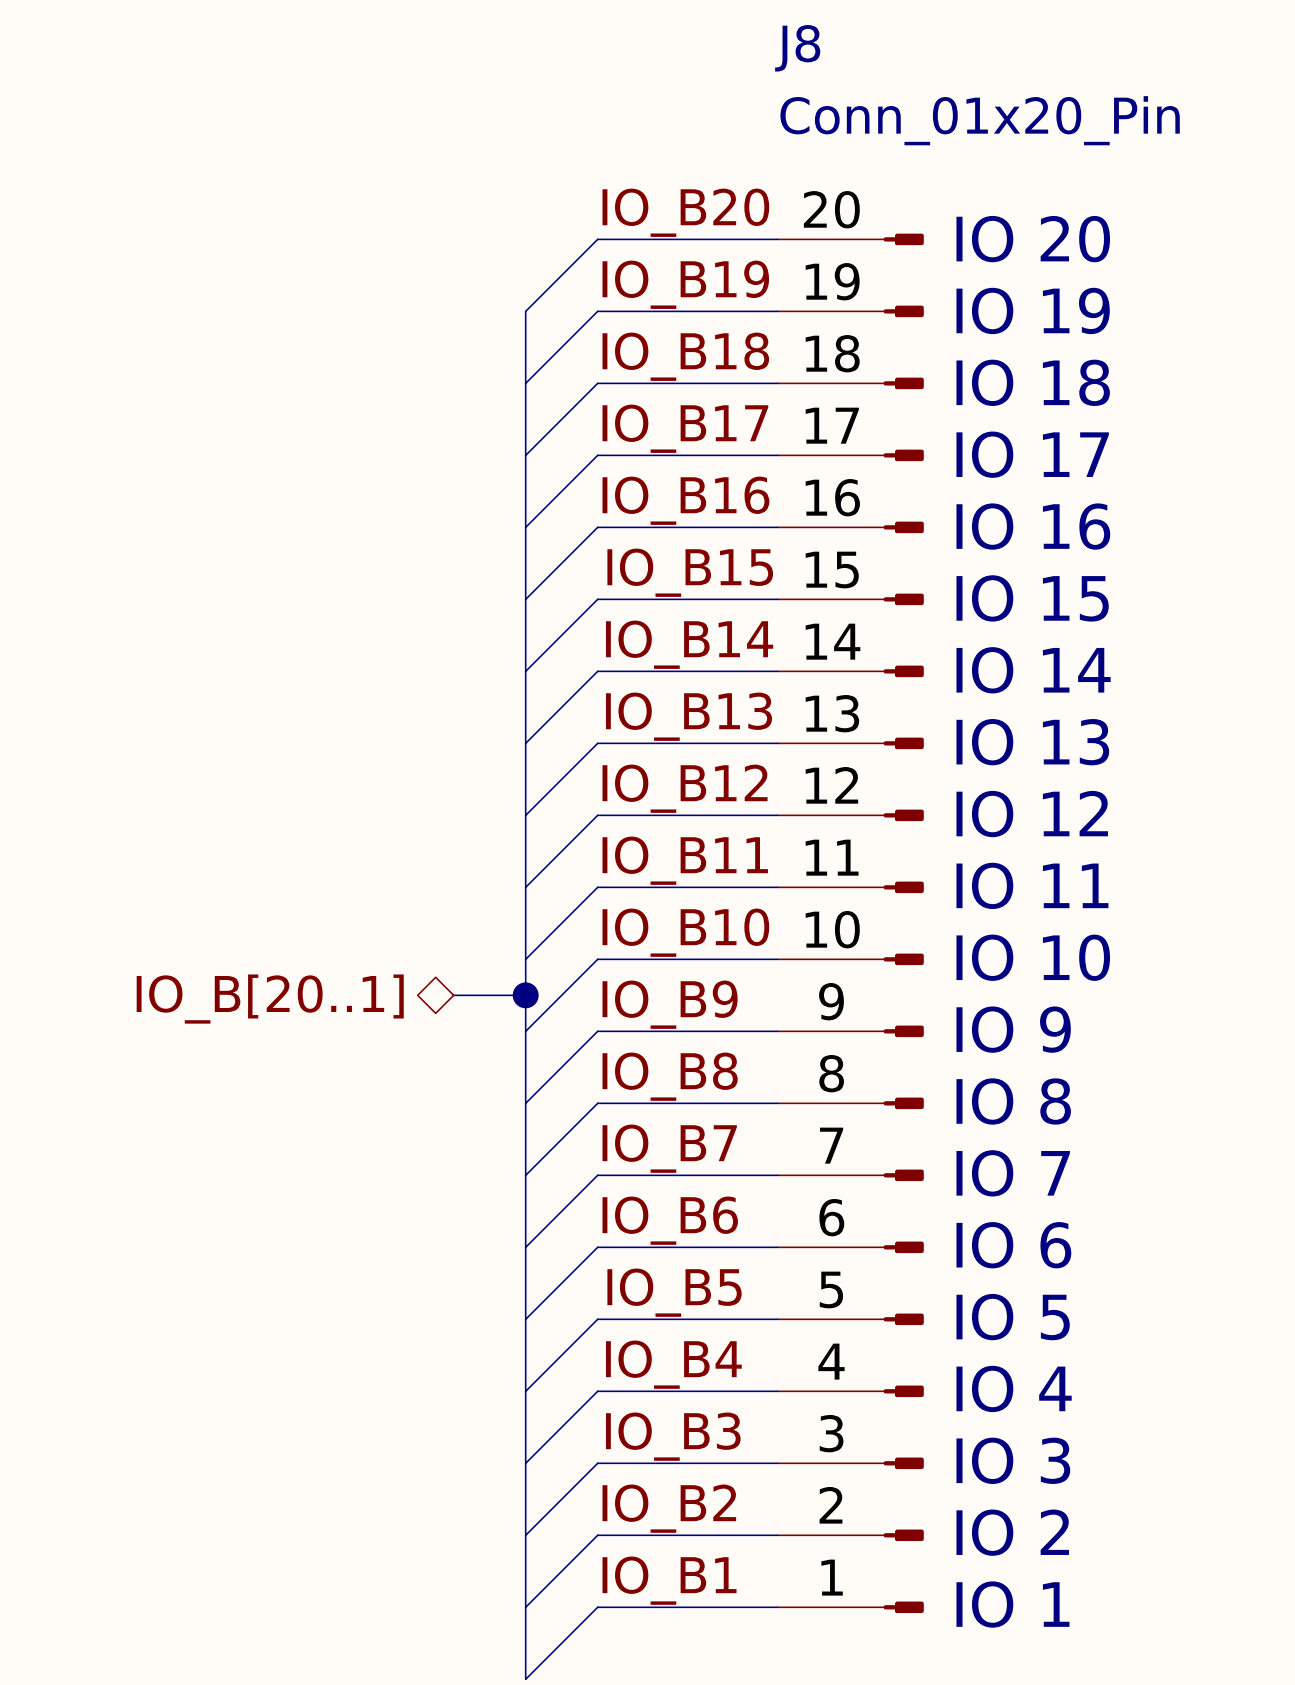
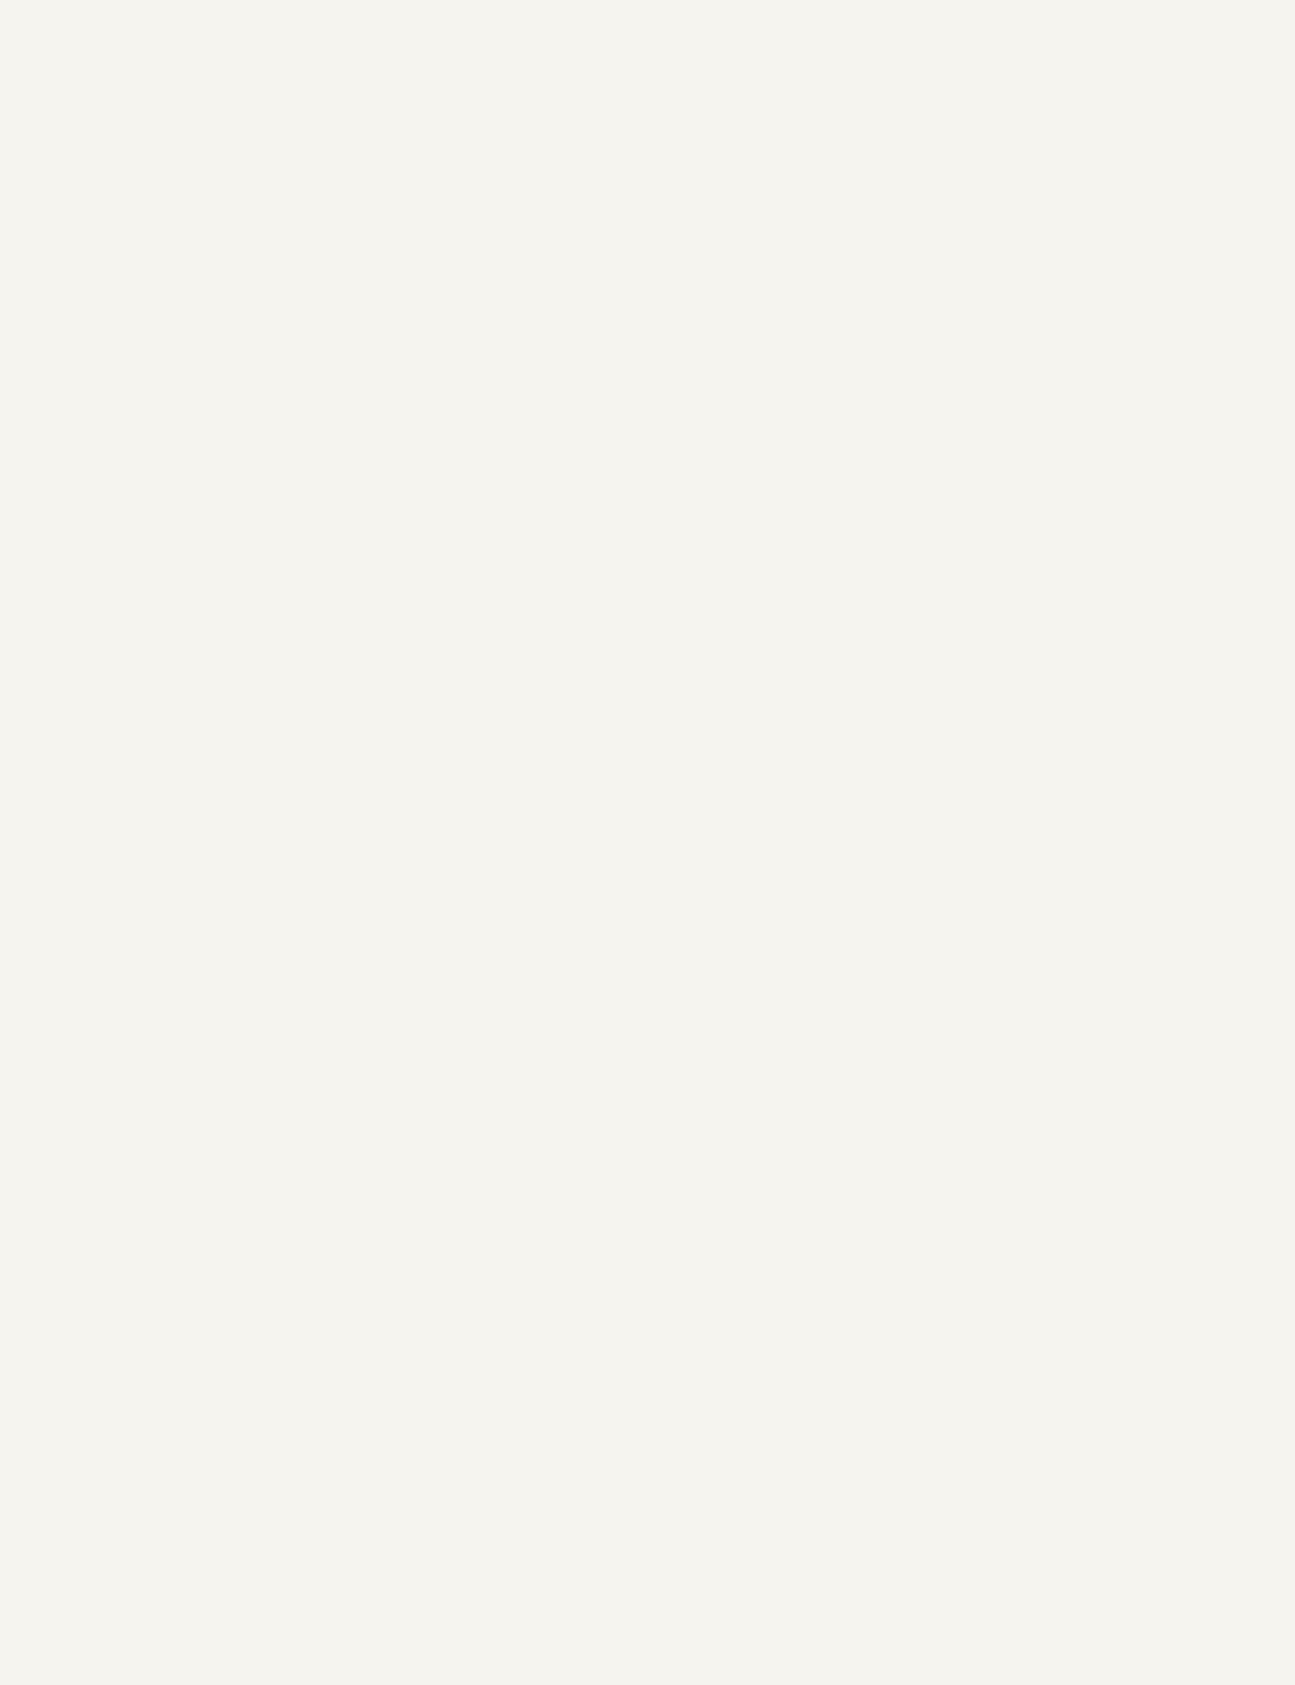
label: IO_B20 (685, 212) -> none
wire: (777, 239) (597, 239) (525, 311) -> none
text: IO 20 (1033, 239) -> none
label: IO_B19 (685, 284) -> none
text: IO 19 (1033, 310) -> none
bus: (525, 311) (525, 1679) -> none
wire: (777, 311) (597, 311) (525, 383) -> none
label: IO_B18 (685, 356) -> none
text: IO 18 (1033, 382) -> none
wire: (777, 383) (597, 383) (525, 455) -> none
label: IO_B17 (685, 428) -> none
text: IO 17 (1032, 454) -> none
wire: (777, 455) (597, 455) (525, 527) -> none
label: IO_B16 (685, 500) -> none
text: IO 16 (1033, 526) -> none
wire: (777, 527) (597, 527) (525, 599) -> none
label: IO_B15 (690, 572) -> none
text: IO 15 (1032, 598) -> none
wire: (777, 599) (597, 599) (525, 671) -> none
label: IO_B14 (689, 644) -> none
text: IO 14 (1033, 670) -> none
wire: (777, 671) (597, 671) (525, 743) -> none
label: IO_B13 (688, 716) -> none
text: IO 13 (1032, 742) -> none
wire: (777, 743) (597, 743) (525, 815) -> none
label: IO_B12 (685, 788) -> none
text: IO 12 (1032, 814) -> none
wire: (777, 815) (597, 815) (525, 887) -> none
label: IO_B11 (685, 860) -> none
text: IO 11 (1032, 885) -> none
wire: (777, 887) (597, 887) (525, 959) -> none
J8: Conn_01x20_Pin (850, 923) -> none
label: IO_B10 (685, 932) -> none
text: IO 10 (1033, 957) -> none
wire: (777, 959) (597, 959) (525, 1031) -> none
bus: (453, 995) (525, 995) -> none
junction: (525, 995) -> none
hierarchical label: IO_B[20..1] (270, 999) -> none
label: IO_B9 (670, 1004) -> none
text: IO 9 (1013, 1029) -> none
wire: (777, 1031) (597, 1031) (525, 1103) -> none
label: IO_B8 (670, 1076) -> none
text: IO 8 (1013, 1101) -> none
wire: (777, 1103) (597, 1103) (525, 1175) -> none
label: IO_B7 (669, 1148) -> none
text: IO 7 (1013, 1173) -> none
wire: (777, 1175) (597, 1175) (525, 1247) -> none
label: IO_B6 (670, 1220) -> none
text: IO 6 (1013, 1245) -> none
wire: (777, 1247) (597, 1247) (525, 1319) -> none
label: IO_B5 (674, 1292) -> none
text: IO 5 (1013, 1317) -> none
wire: (777, 1319) (597, 1319) (525, 1391) -> none
label: IO_B4 (673, 1364) -> none
text: IO 4 (1014, 1388) -> none
wire: (777, 1391) (597, 1391) (525, 1463) -> none
label: IO_B3 (673, 1436) -> none
text: IO 3 (1013, 1460) -> none
wire: (777, 1463) (597, 1463) (525, 1535) -> none
label: IO_B2 (669, 1508) -> none
text: IO 2 (1012, 1532) -> none
wire: (777, 1535) (597, 1535) (525, 1607) -> none
label: IO_B1 (669, 1580) -> none
text: IO 1 (1012, 1604) -> none
wire: (777, 1607) (597, 1607) (525, 1679) -> none

